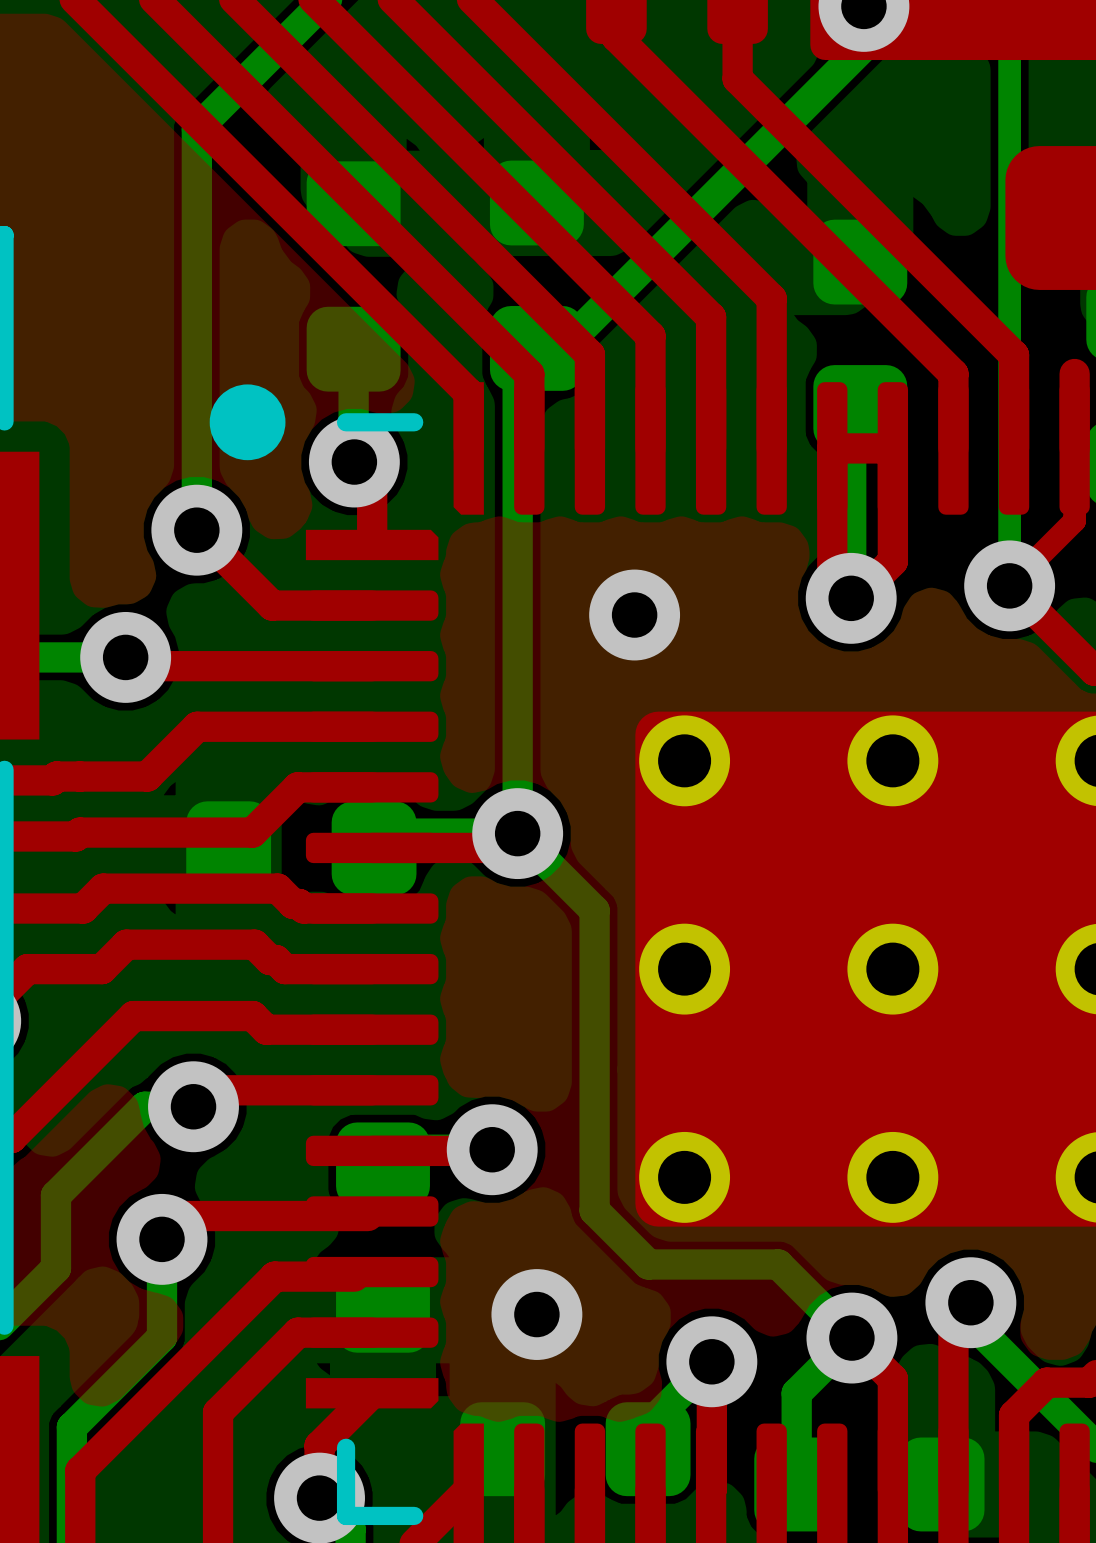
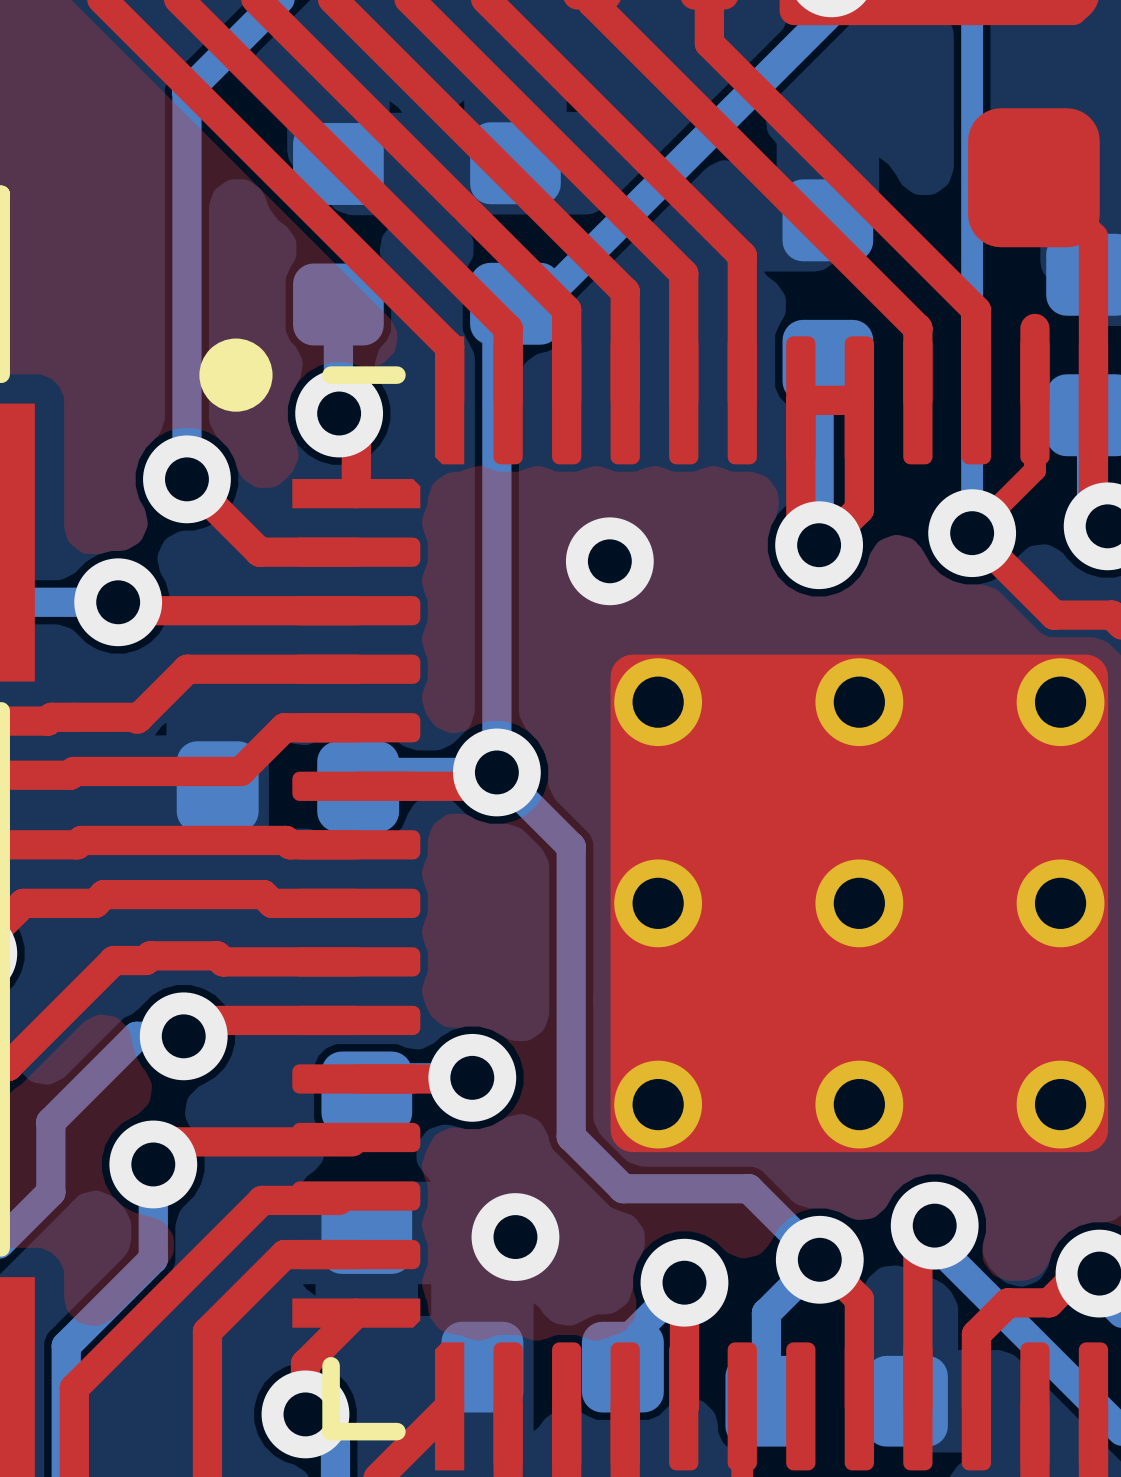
top track: (87, 903) (103, 888) (277, 888) (293, 903) -> (81, 840) (280, 840)
top track: (111, 960) (126, 944) (254, 944) (269, 960) -> (104, 894) (257, 894)
top track: (121, 1028) (133, 1016) (252, 1016) (266, 1029) -> (114, 960) (145, 960) (150, 955) (217, 955) (223, 961) (254, 961)

